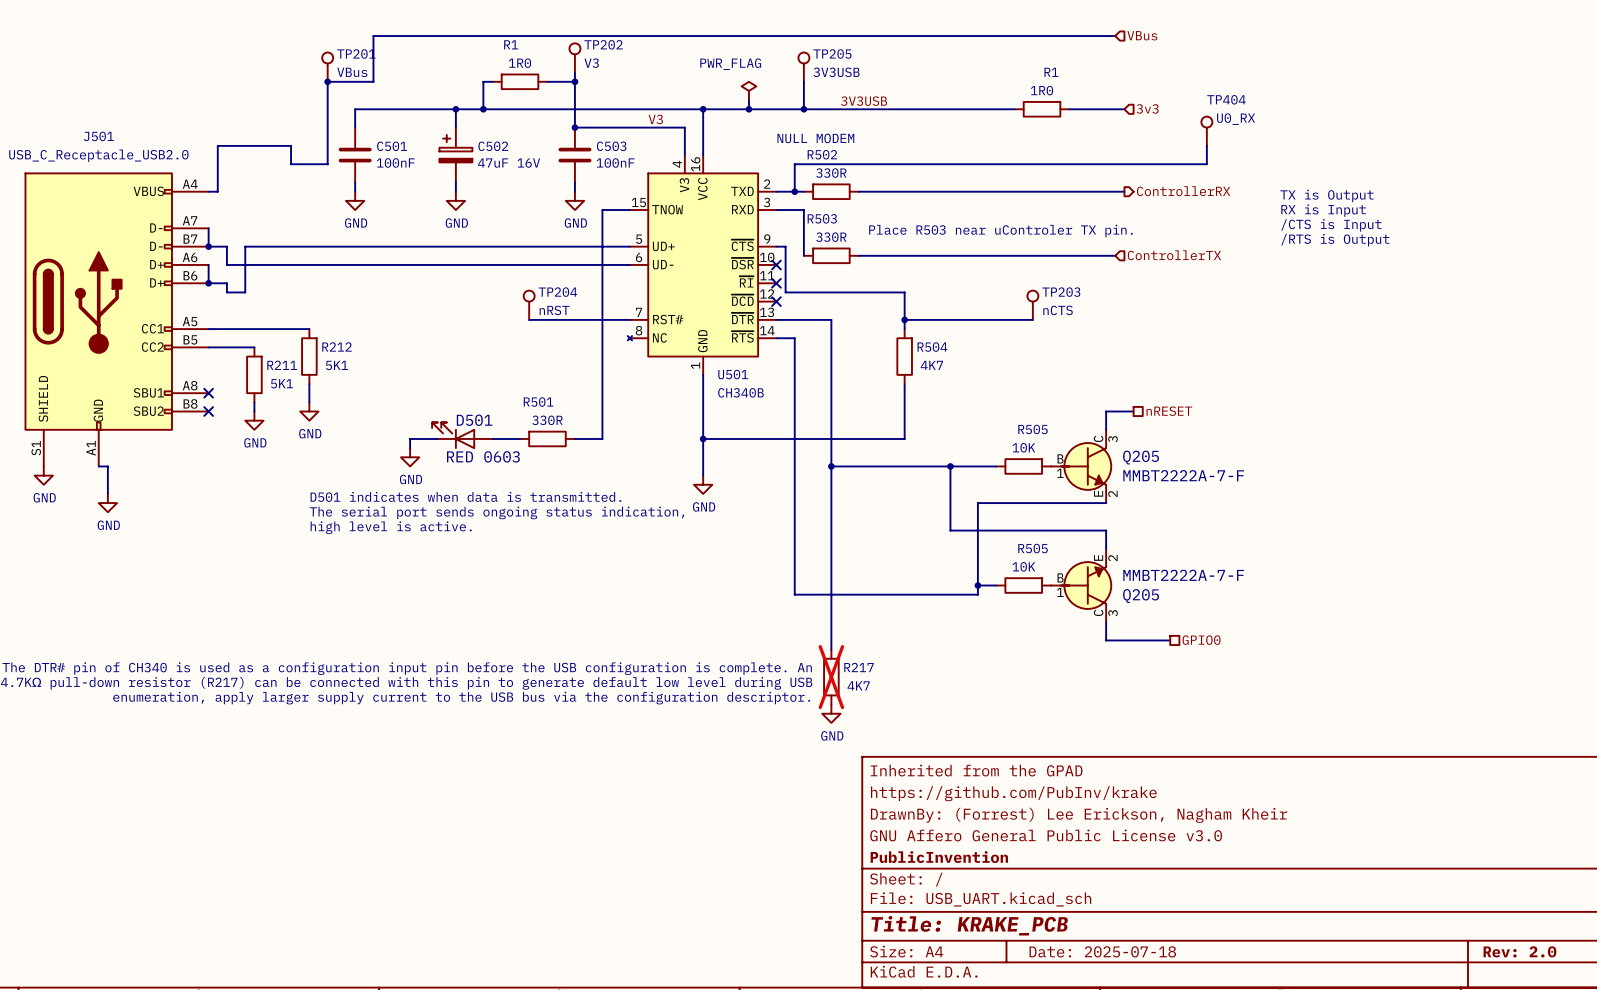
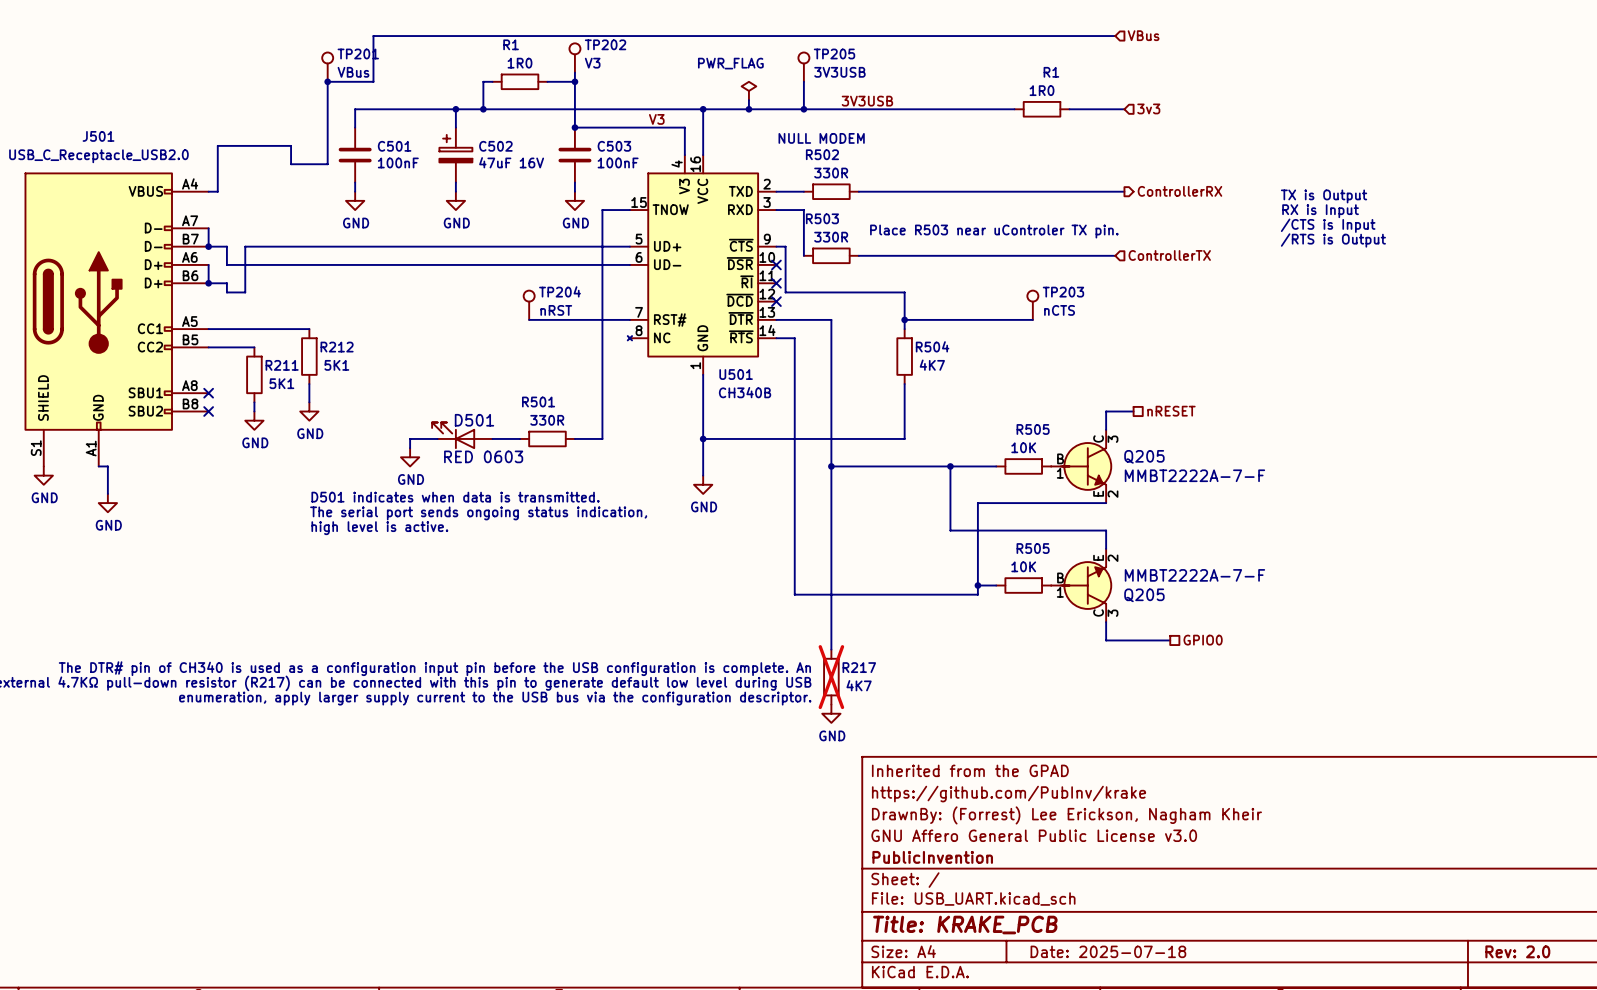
TP404: U0_RX (1206, 131) -> none
wire: (1206, 145) (1206, 164) (794, 164) (794, 191) -> none
junction: (794, 191) -> none

